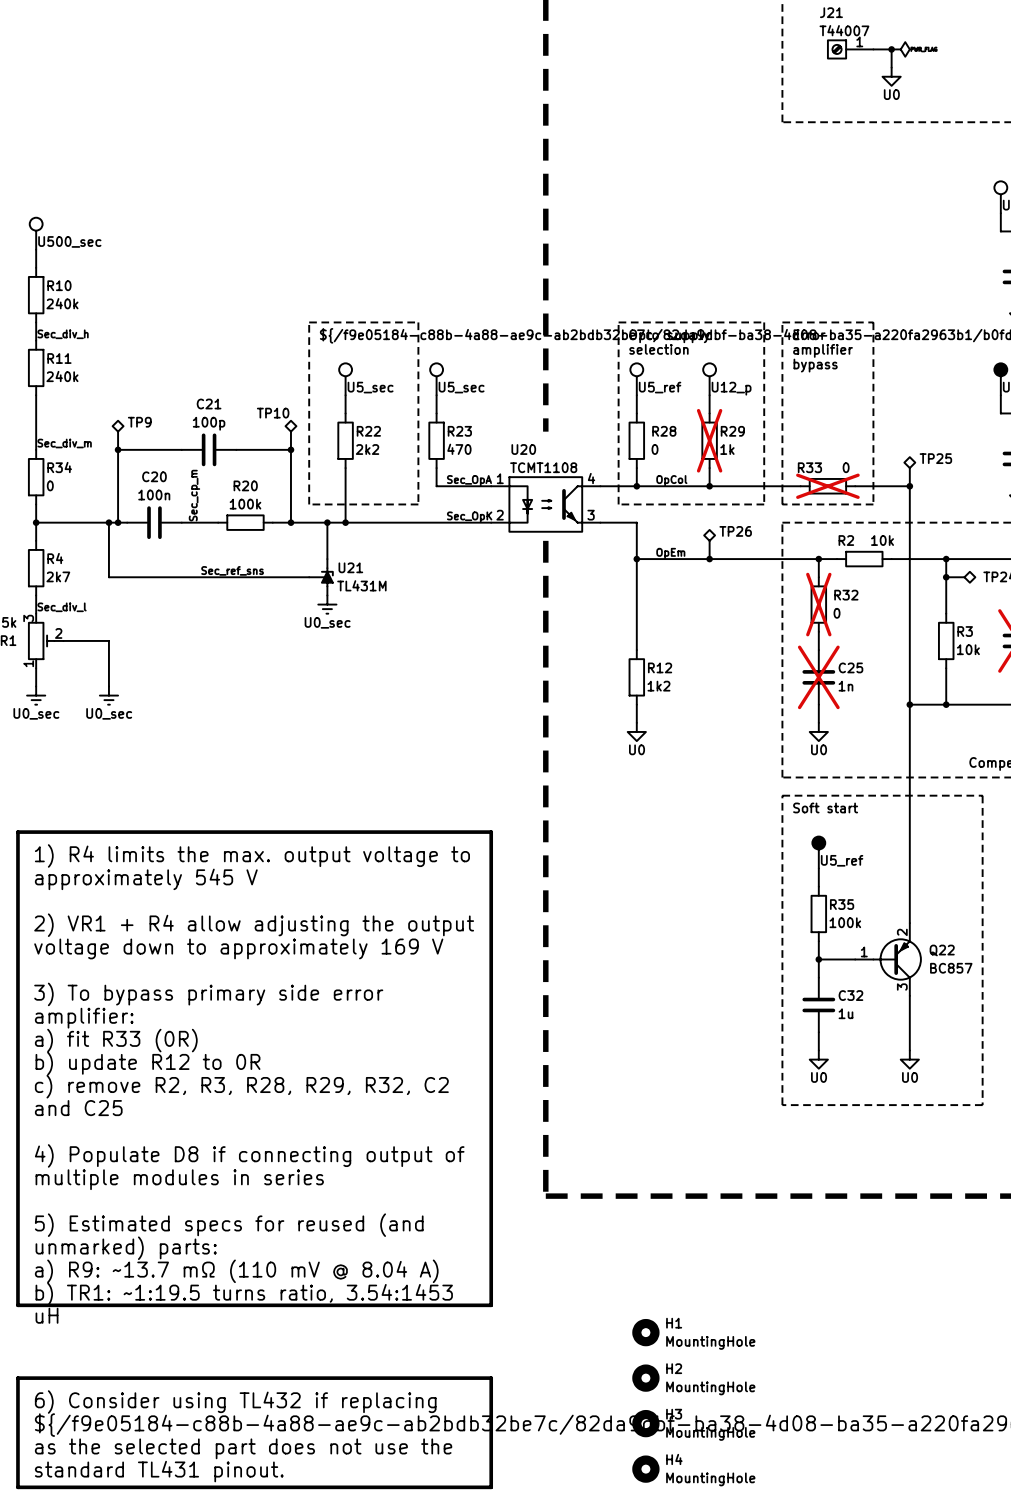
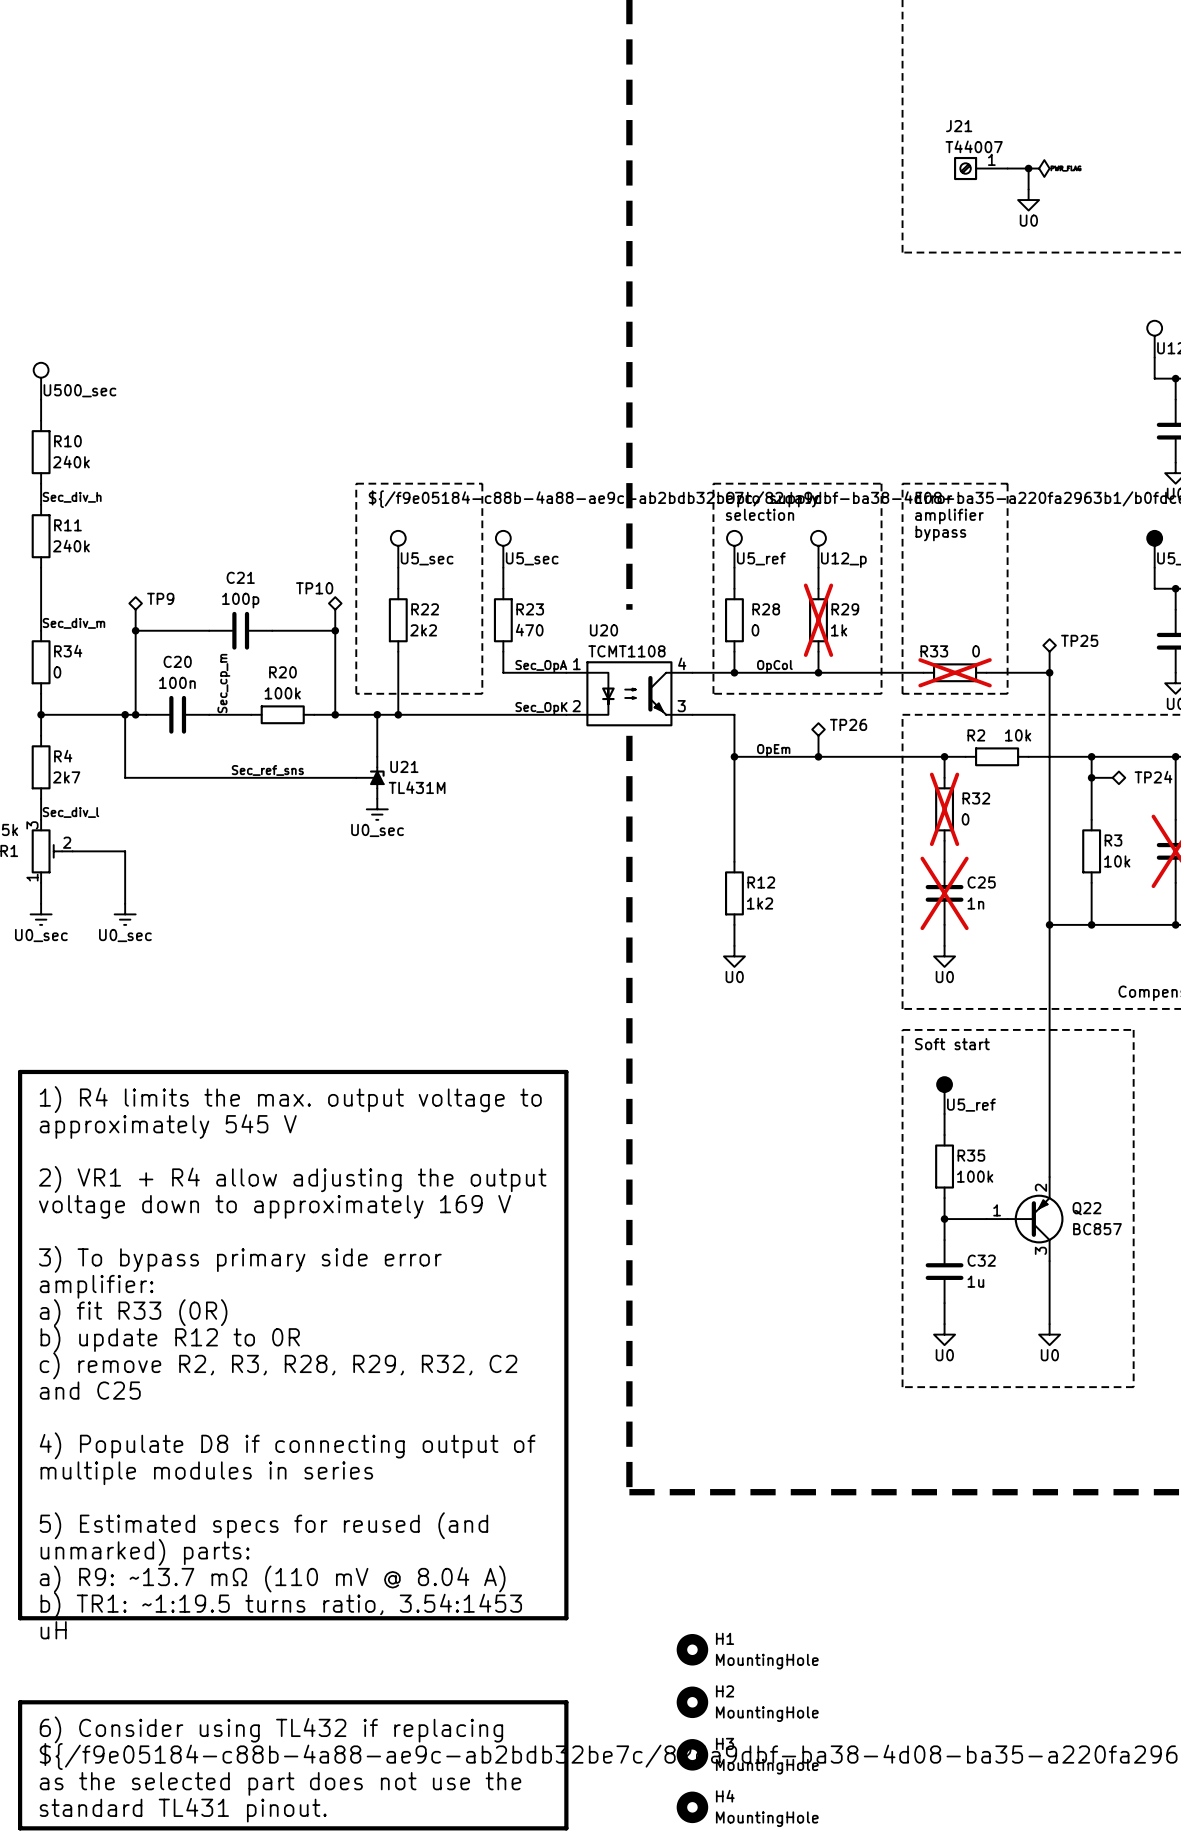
H1 position: (645, 1332) -> (692, 1649)
H2 position: (645, 1378) -> (692, 1702)
H3 position: (645, 1423) -> (692, 1754)
H4 position: (645, 1469) -> (692, 1807)

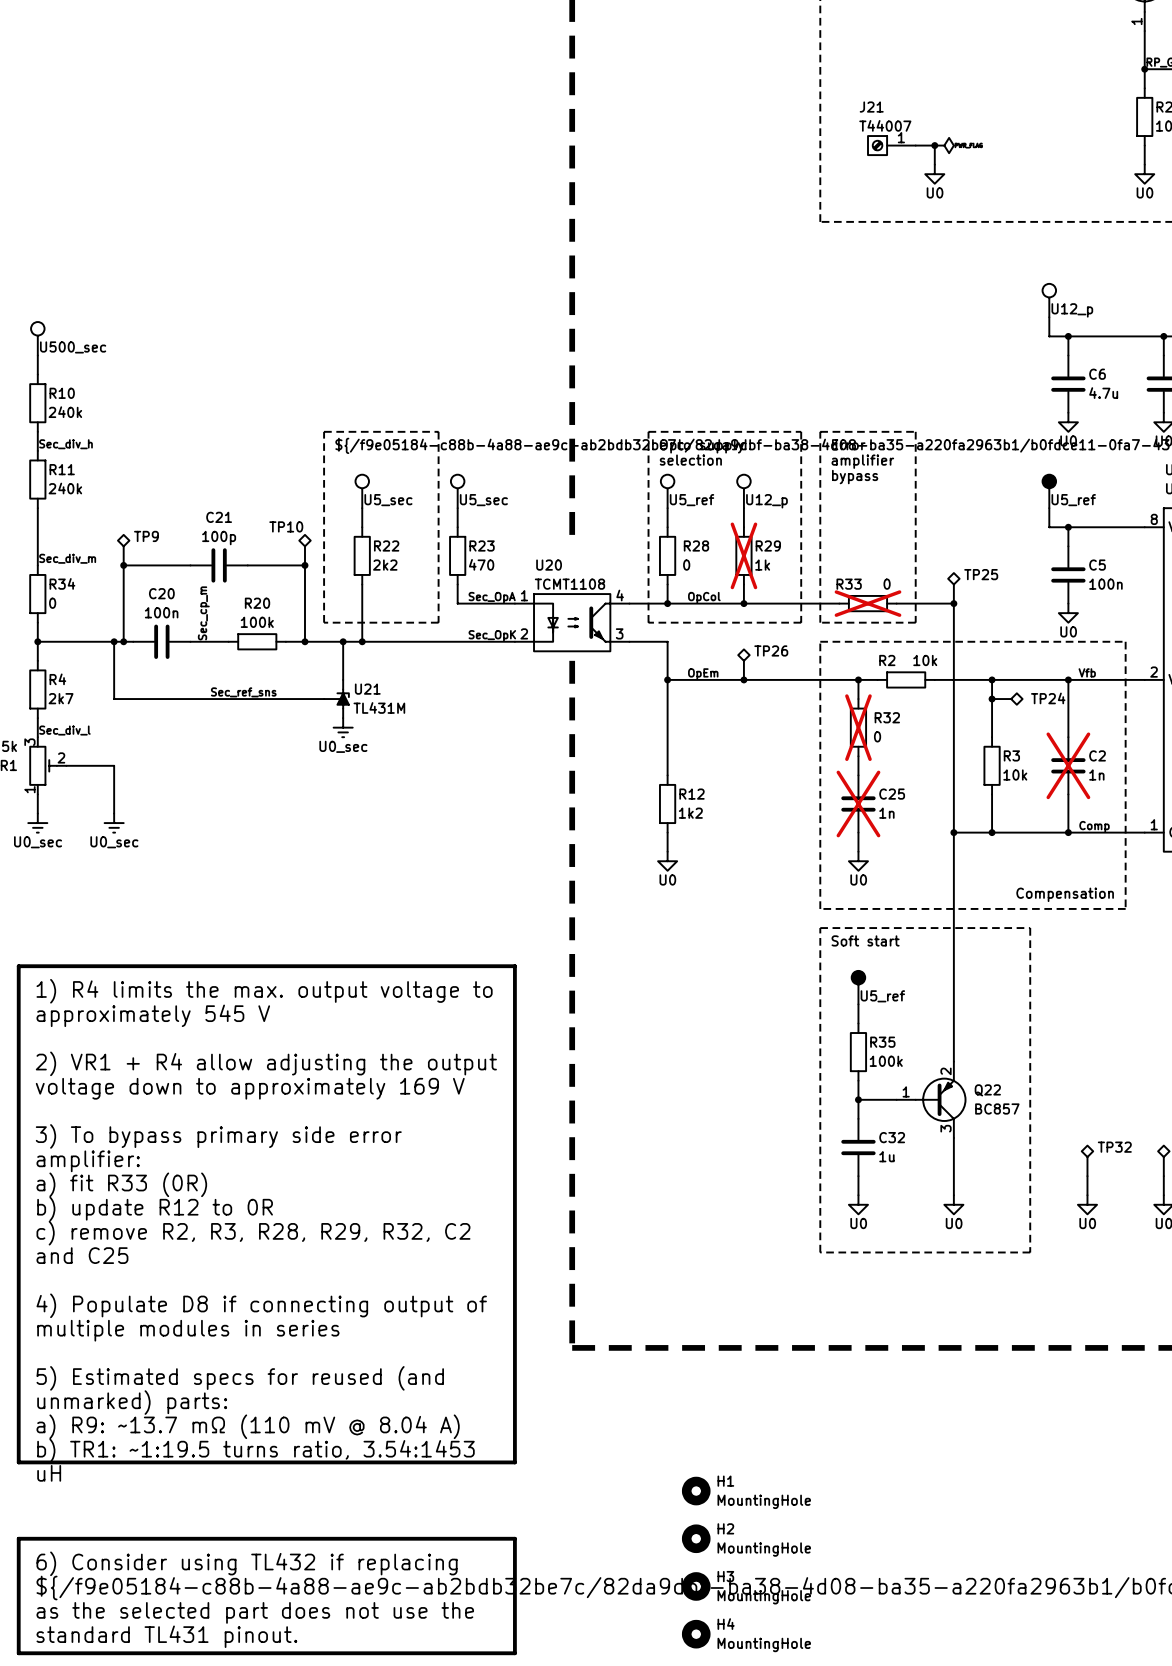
H1 position: (692, 1649) -> (696, 1491)
H2 position: (692, 1702) -> (696, 1538)
H3 position: (692, 1754) -> (696, 1586)
H4 position: (692, 1807) -> (696, 1634)

